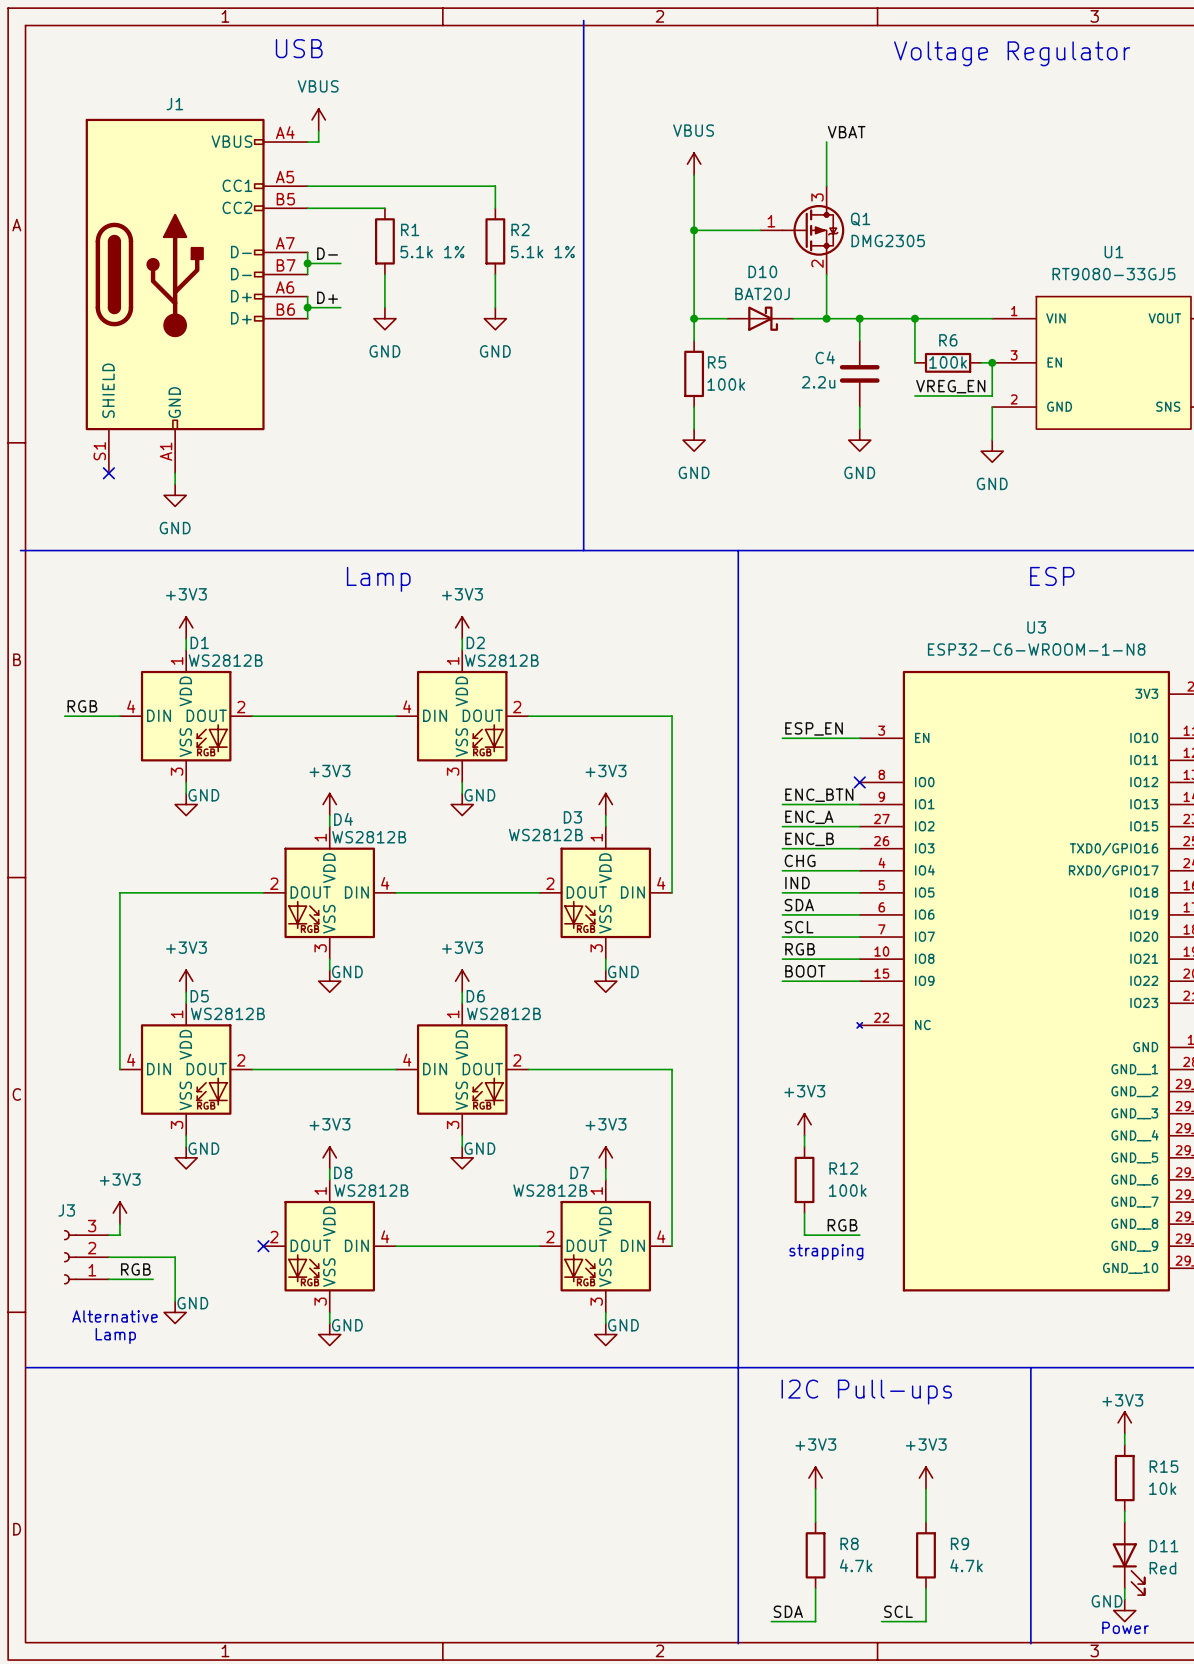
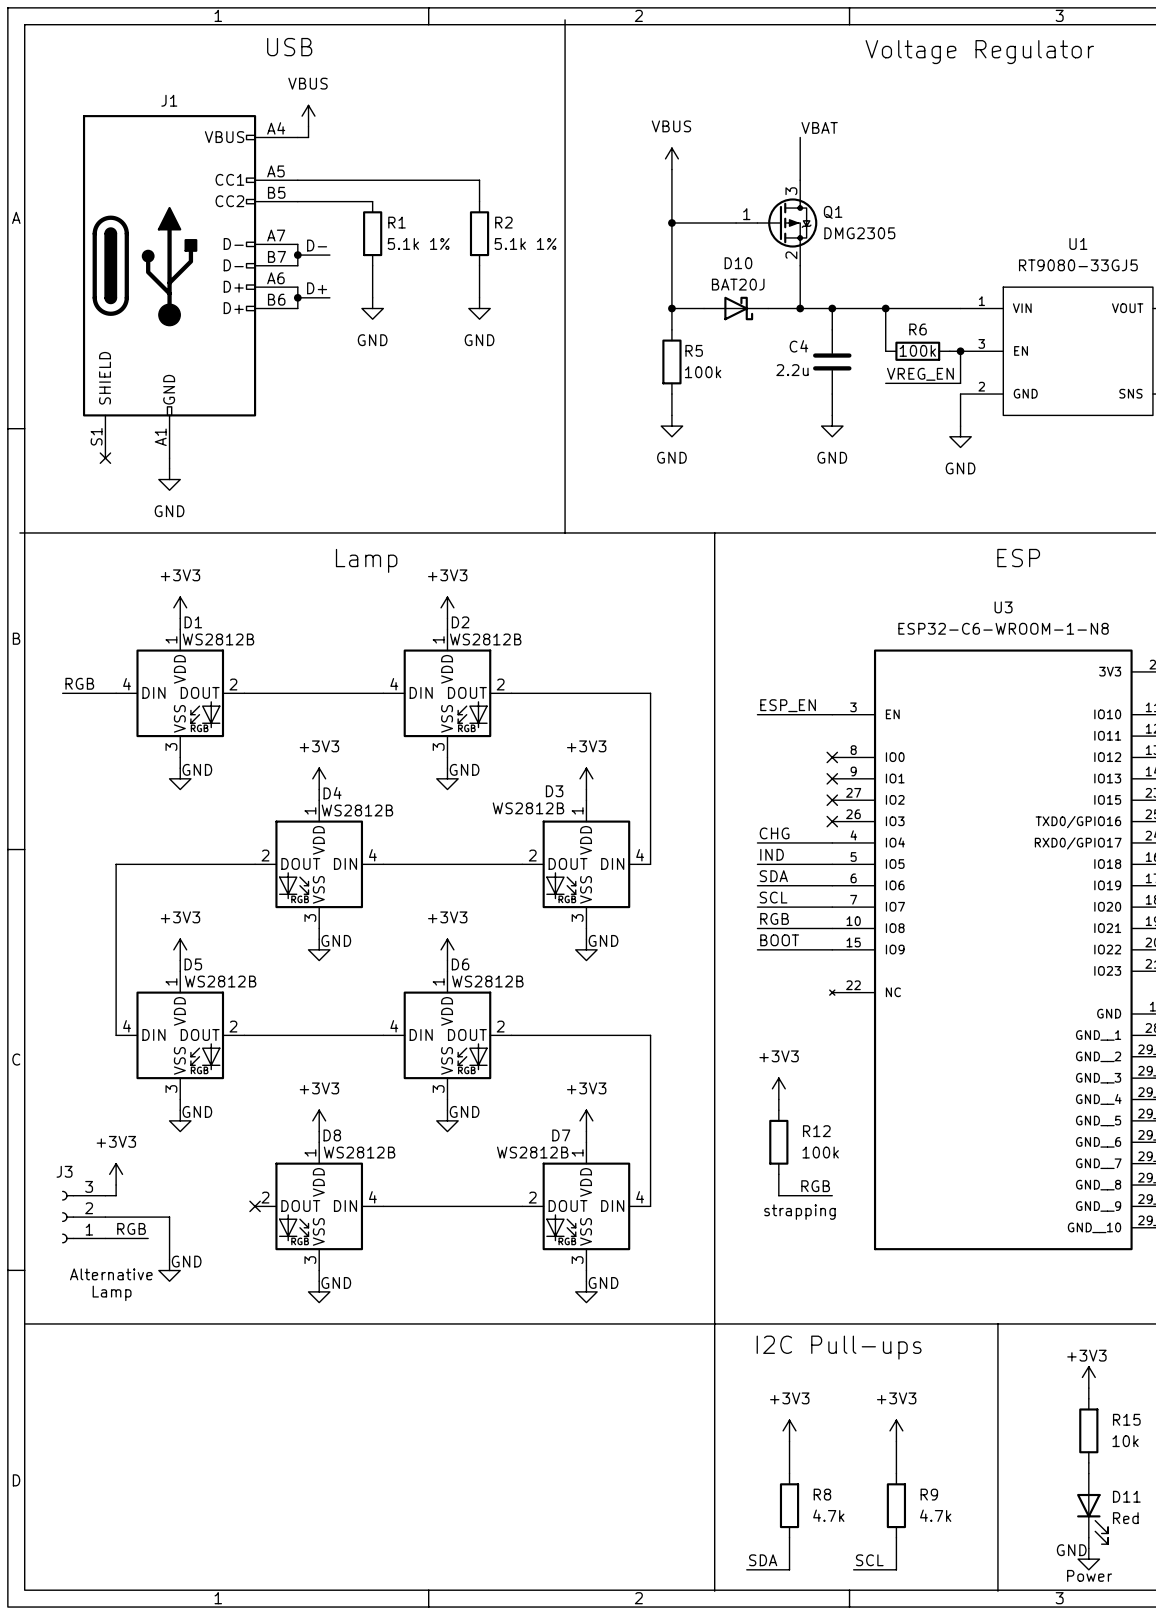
label: ENC_BTN (819, 795) -> none
wire: (782, 804) (859, 804) -> none
no-connect mark: none -> (832, 778)
label: ENC_A (809, 817) -> none
wire: (782, 826) (859, 826) -> none
no-connect mark: none -> (832, 800)
label: ENC_B (809, 839) -> none
wire: (782, 848) (859, 848) -> none
no-connect mark: none -> (832, 821)

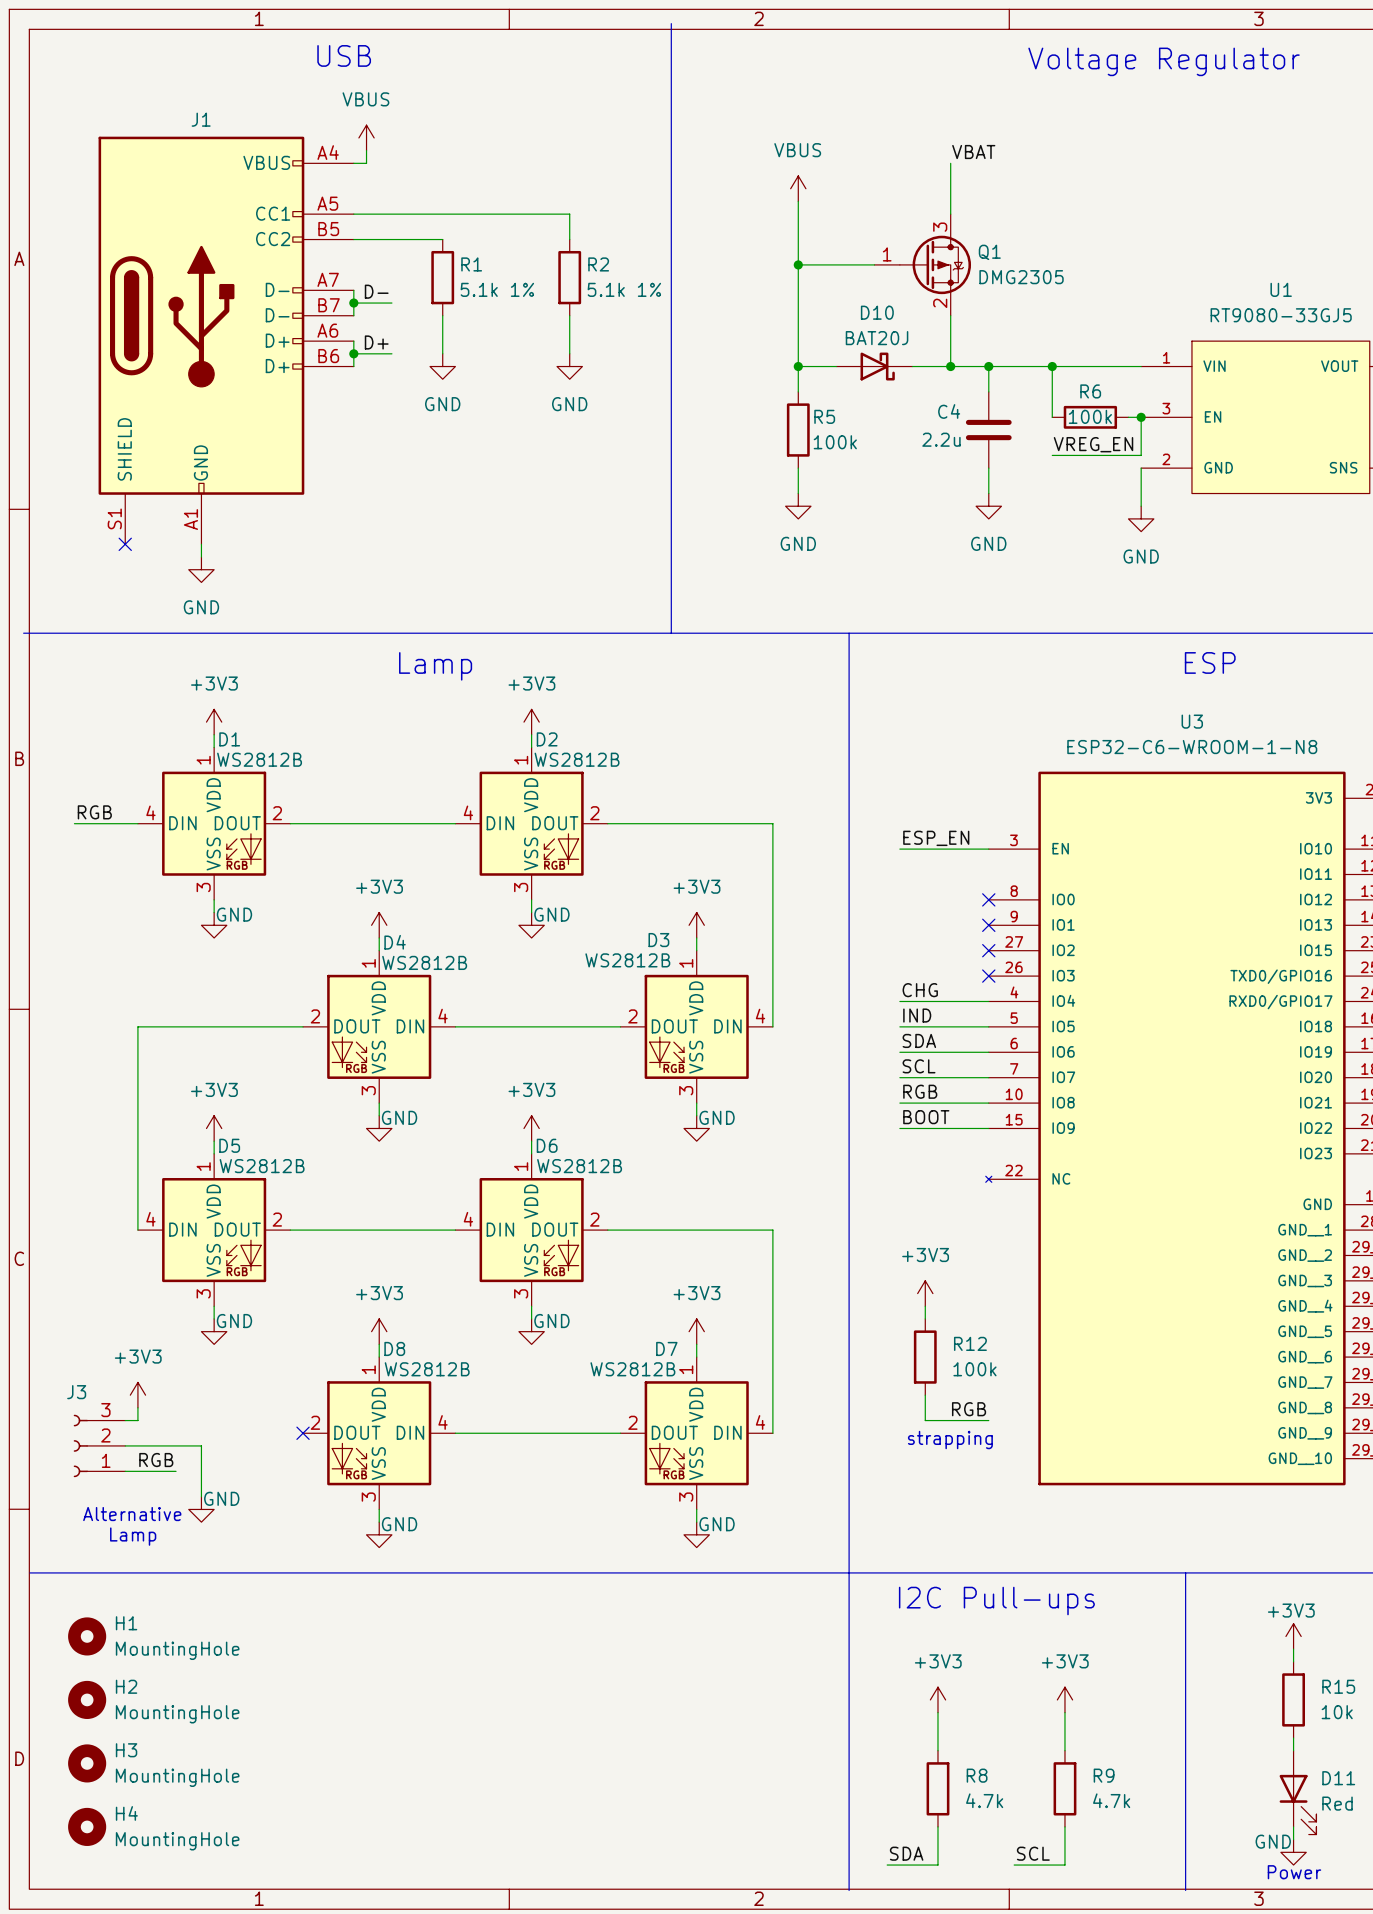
H1: none -> MountingHole (87, 1636)
H2: none -> MountingHole (87, 1699)
H3: none -> MountingHole (87, 1763)
H4: none -> MountingHole (87, 1826)

